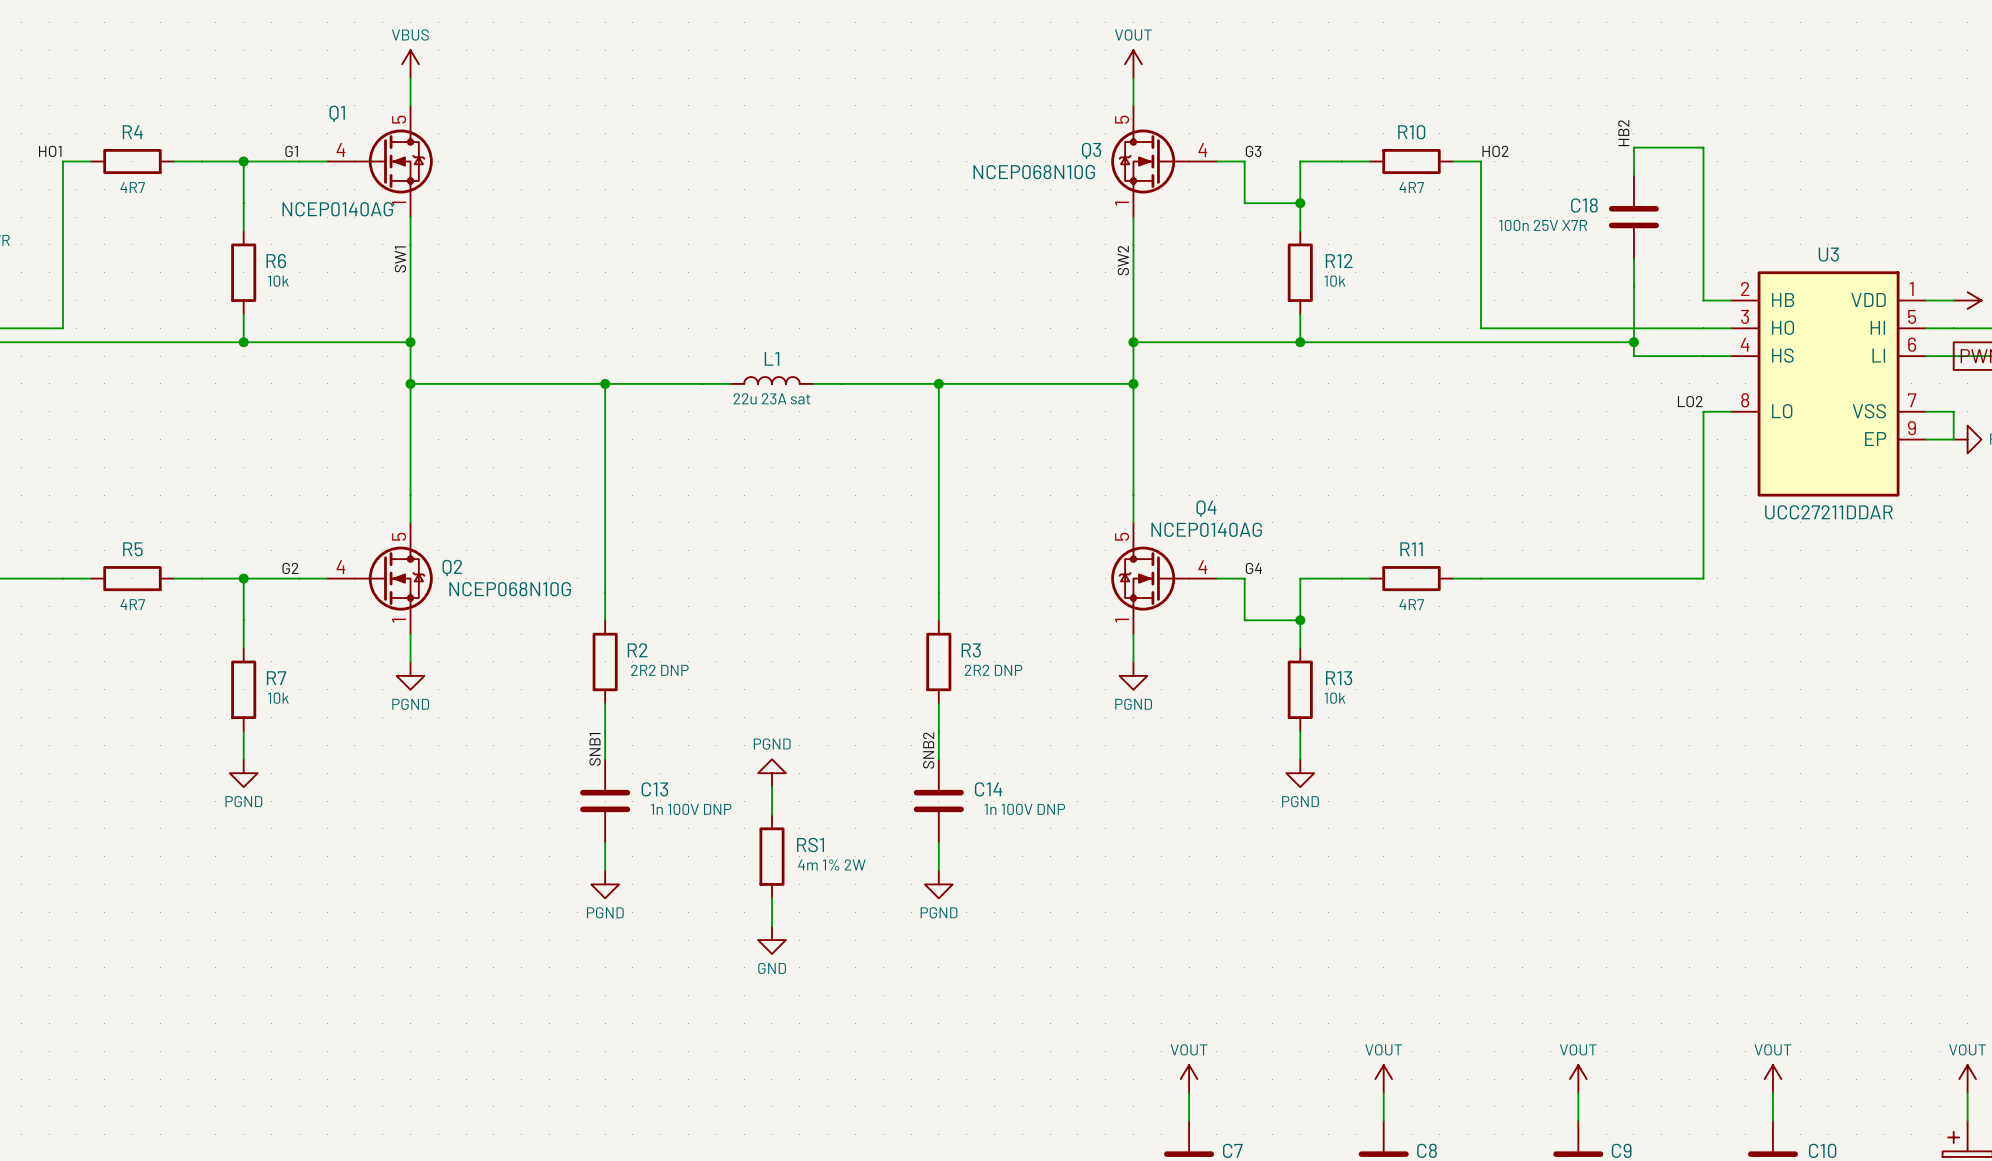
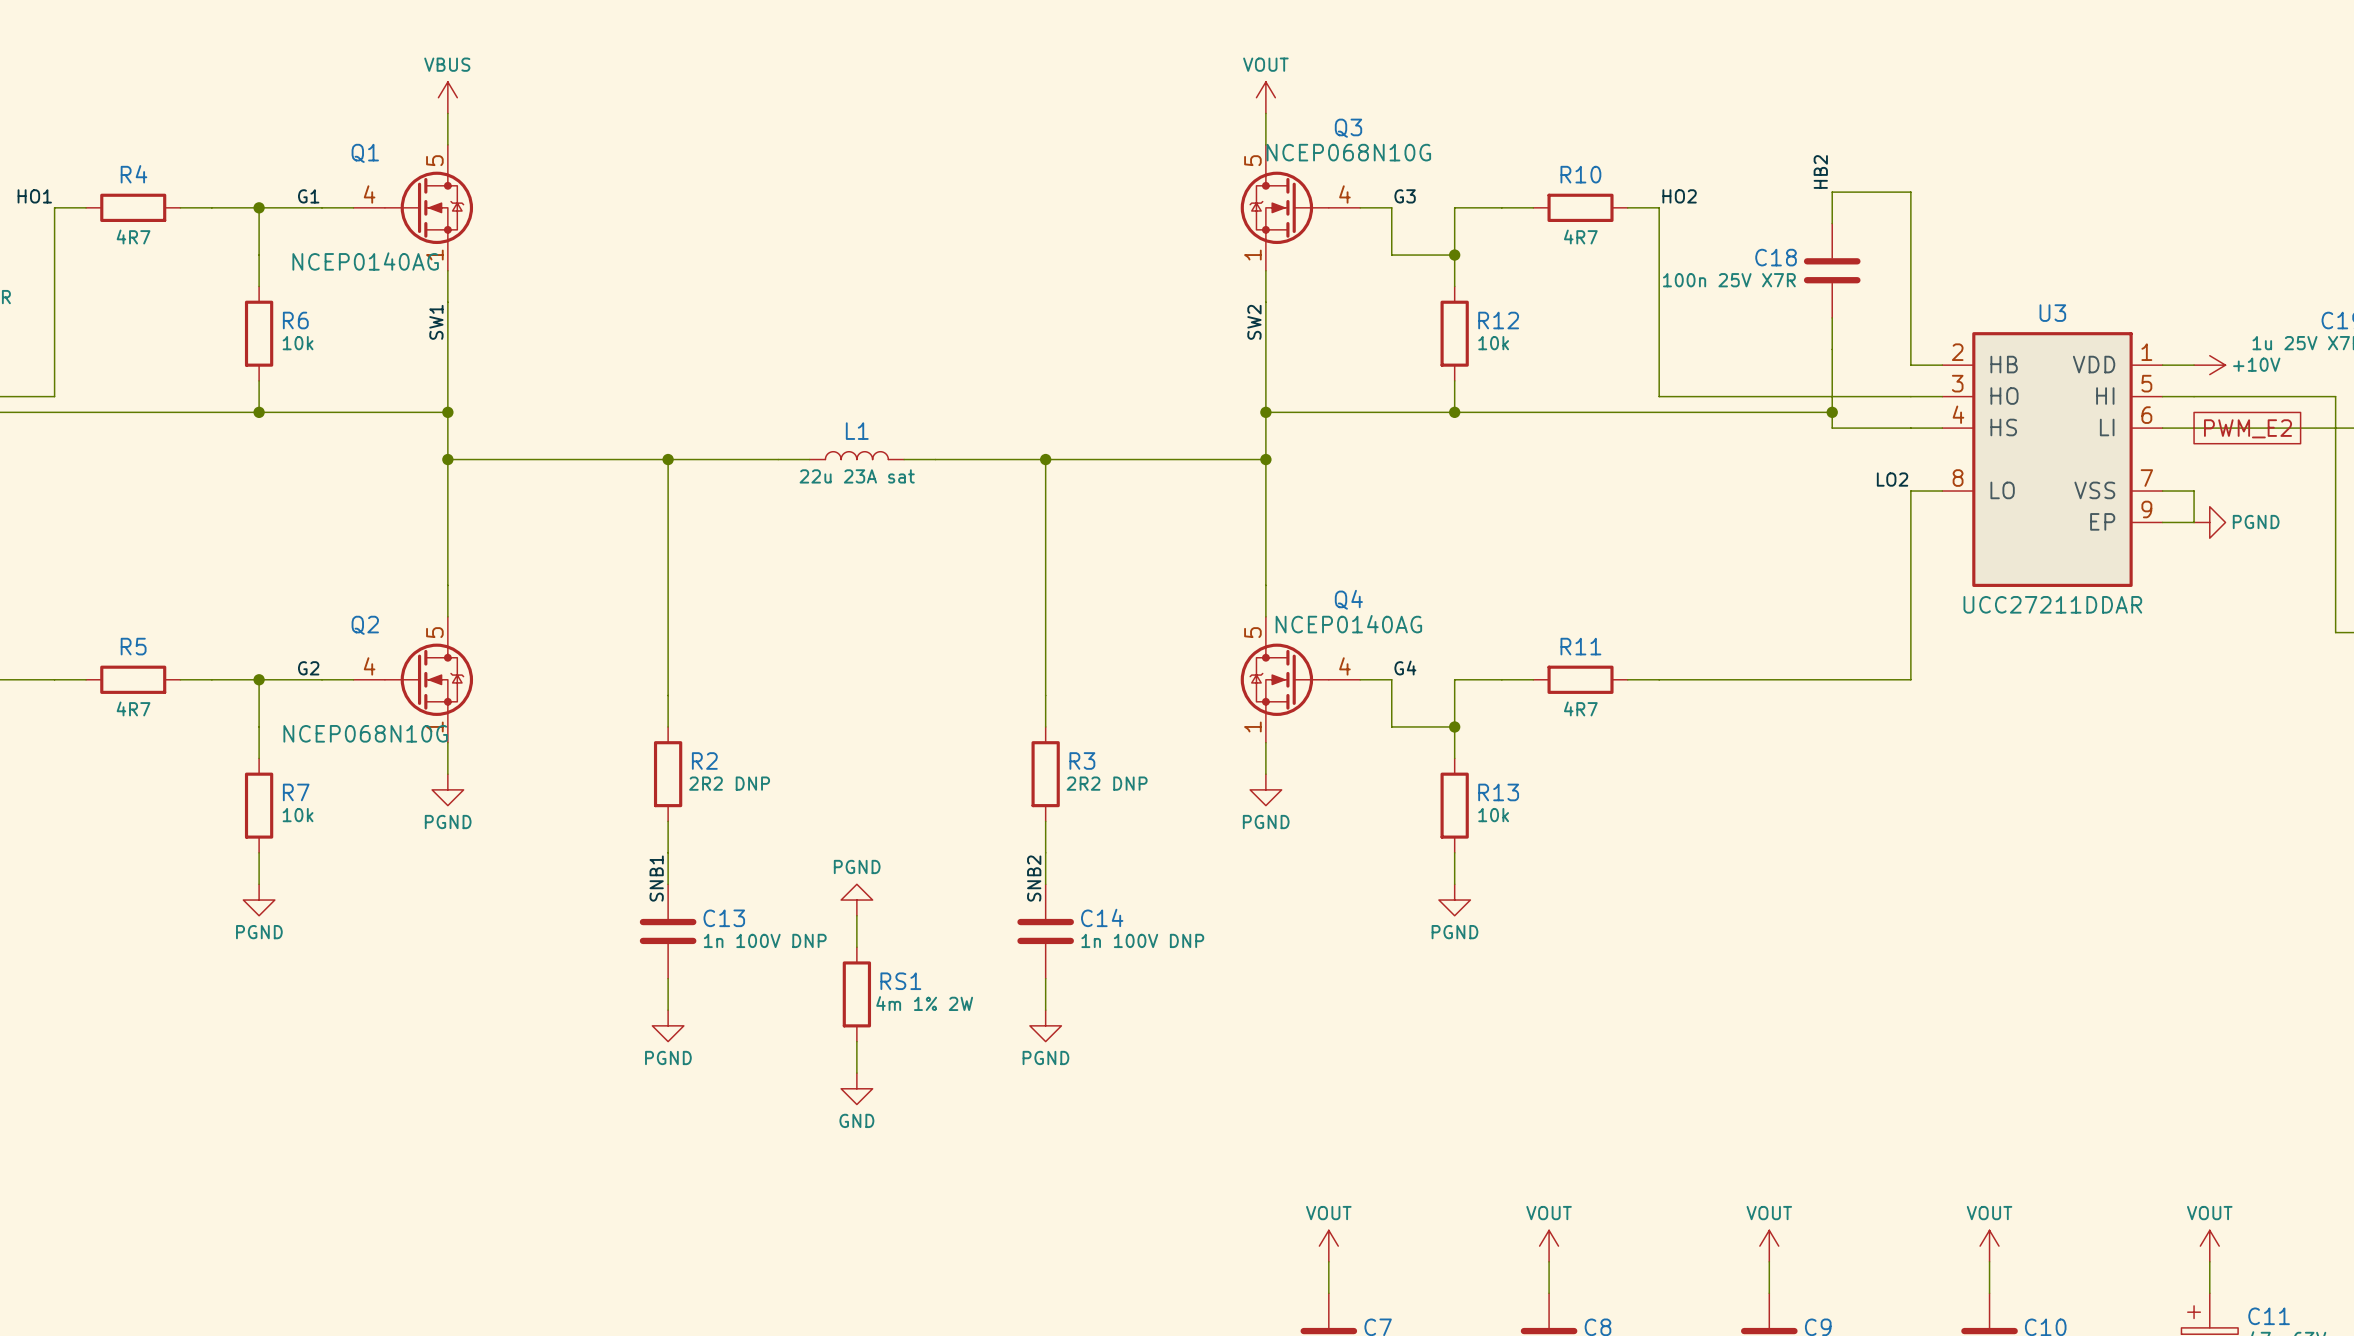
Q3 name position: Q3 (1091, 150) -> Q3 (1348, 128)
Q3 value position: NCEP068N10G (1034, 172) -> NCEP068N10G (1348, 152)
Q2 name position: Q2 (452, 568) -> Q2 (365, 625)
Q2 value position: NCEP068N10G (510, 589) -> NCEP068N10G (365, 733)

